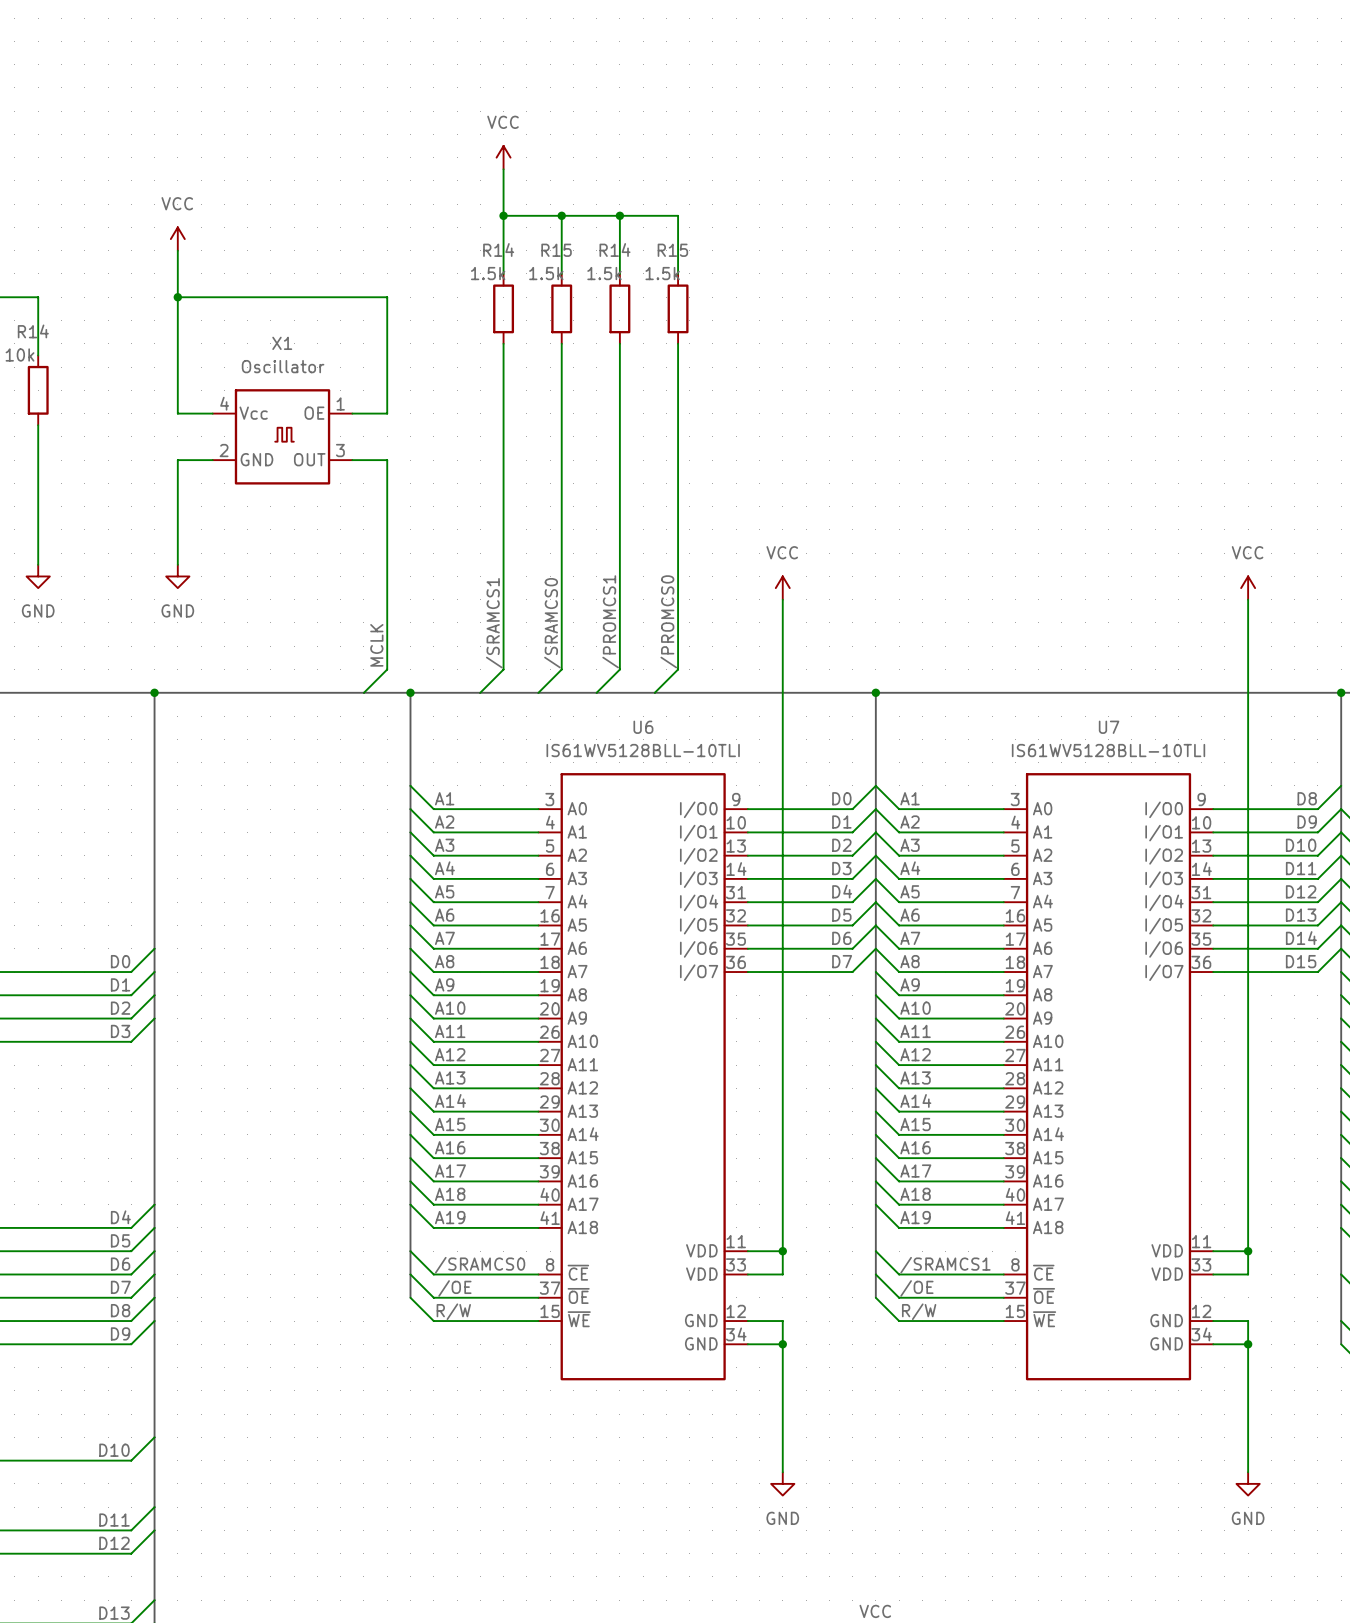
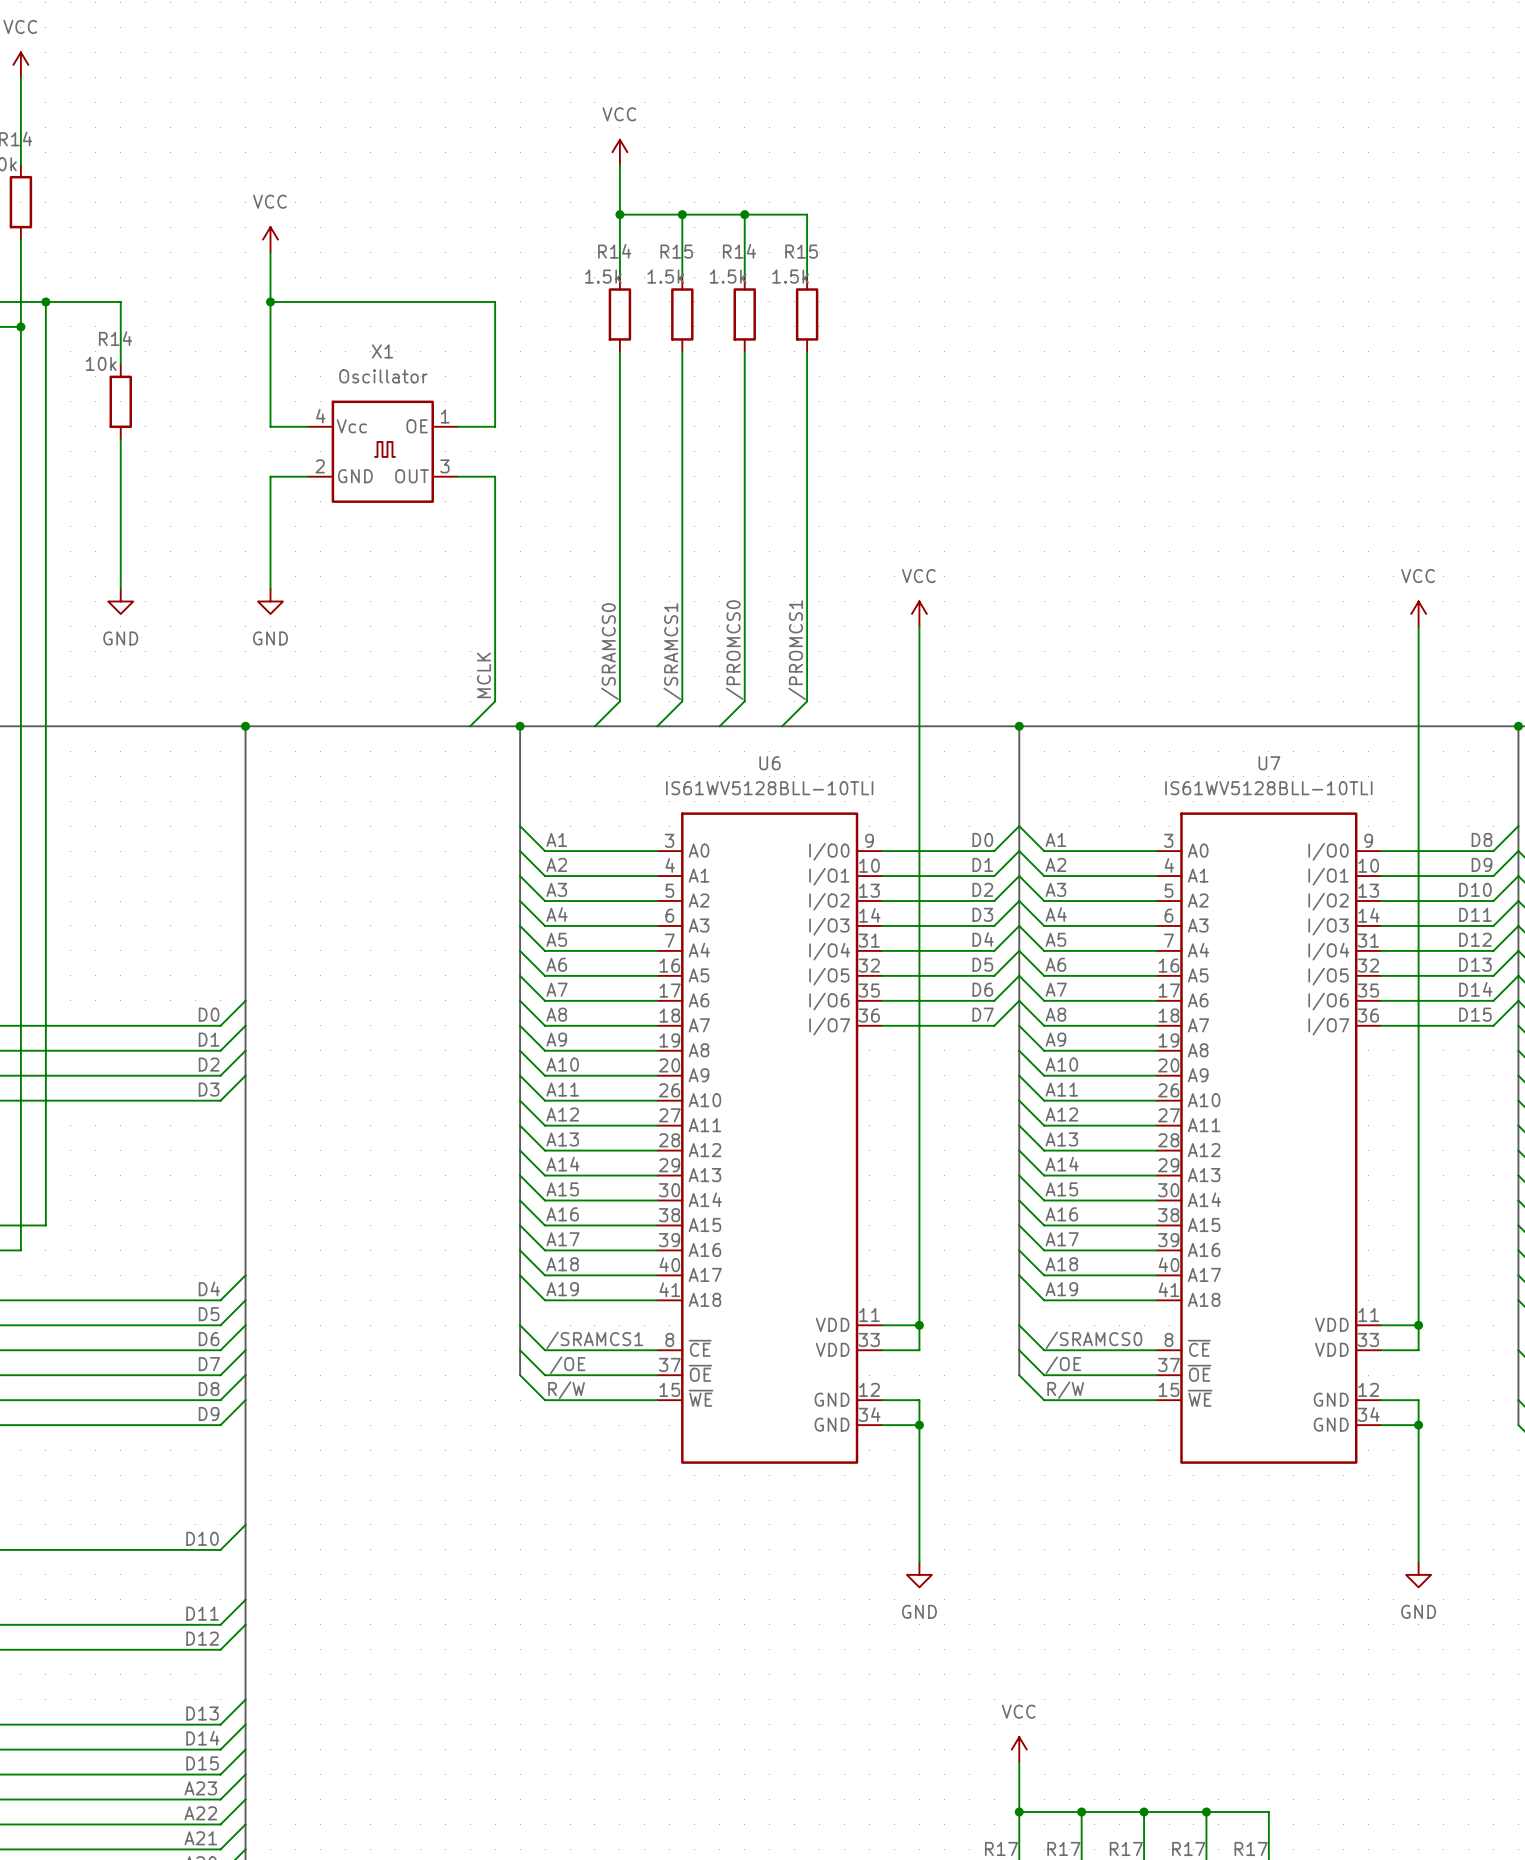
label: /PROMCS1 (610, 621) -> /PROMCS0 (734, 650)
label: /PROMCS0 (668, 621) -> /PROMCS1 (797, 650)
label: /SRAMCS1 (494, 623) -> /SRAMCS0 (609, 651)
label: /SRAMCS0 (552, 623) -> /SRAMCS1 (672, 651)
label: /SRAMCS0 (480, 1265) -> /SRAMCS1 (594, 1340)
label: /SRAMCS1 (945, 1265) -> /SRAMCS0 (1093, 1340)

